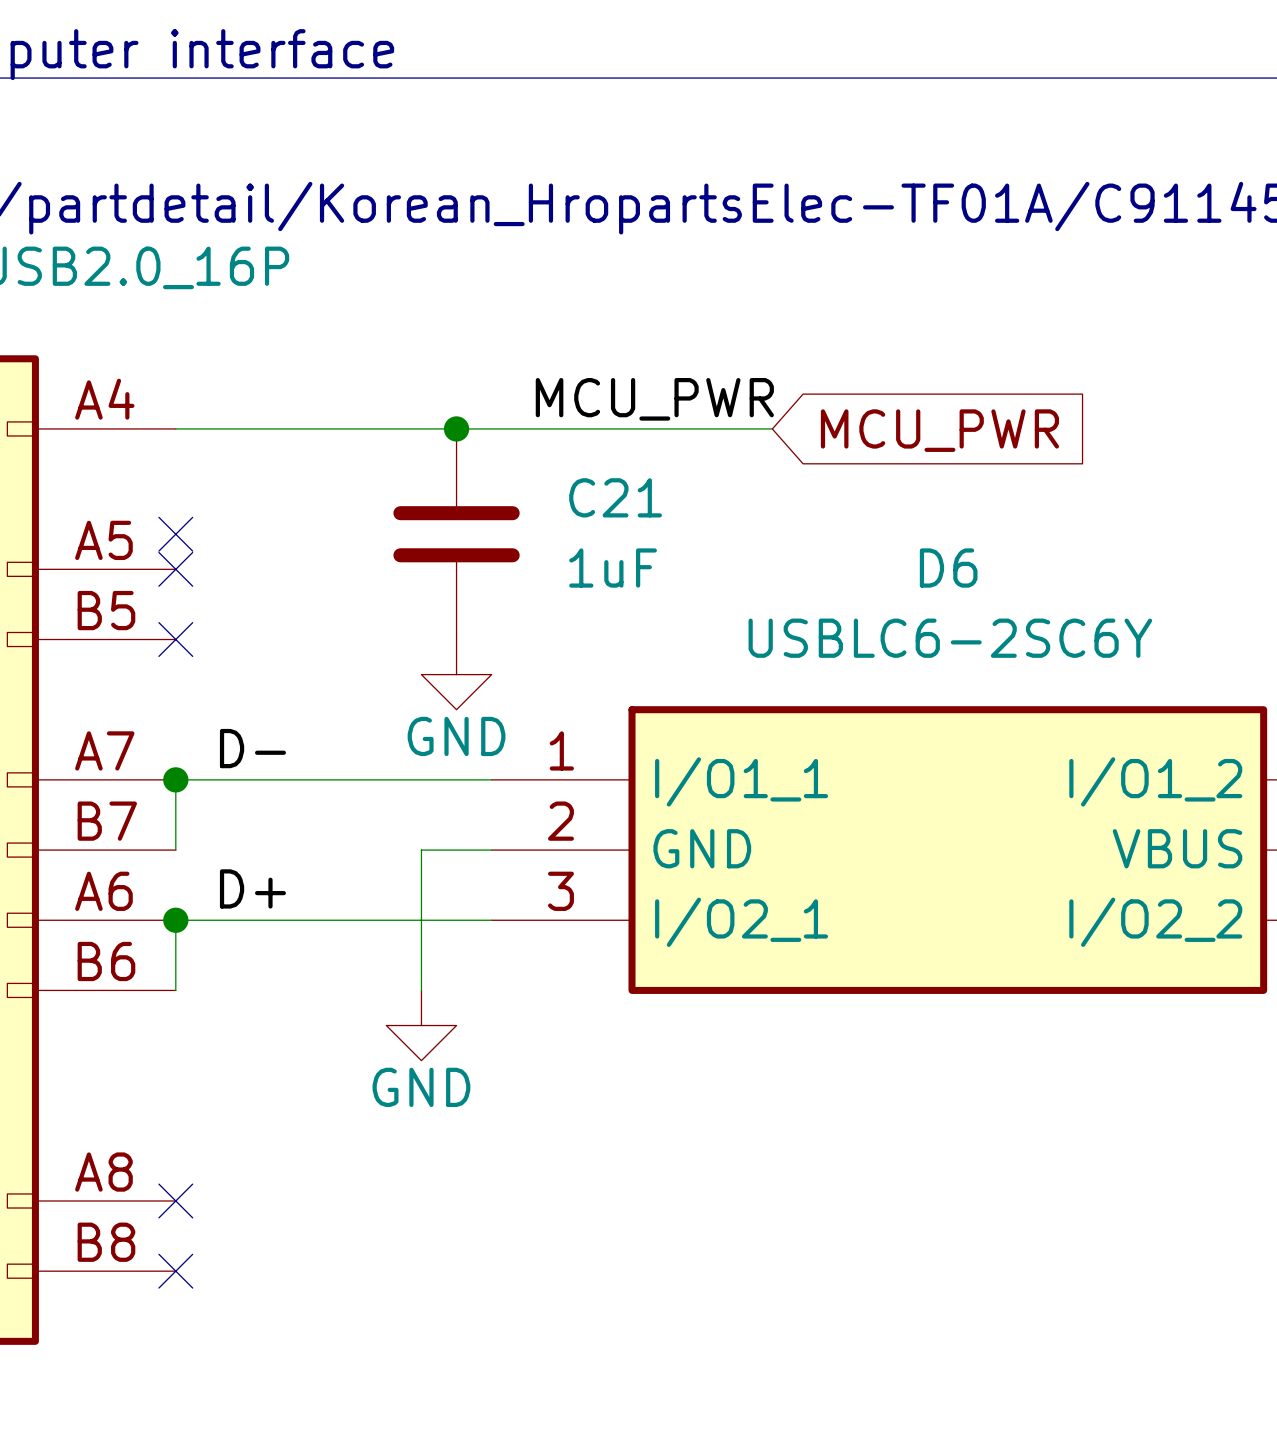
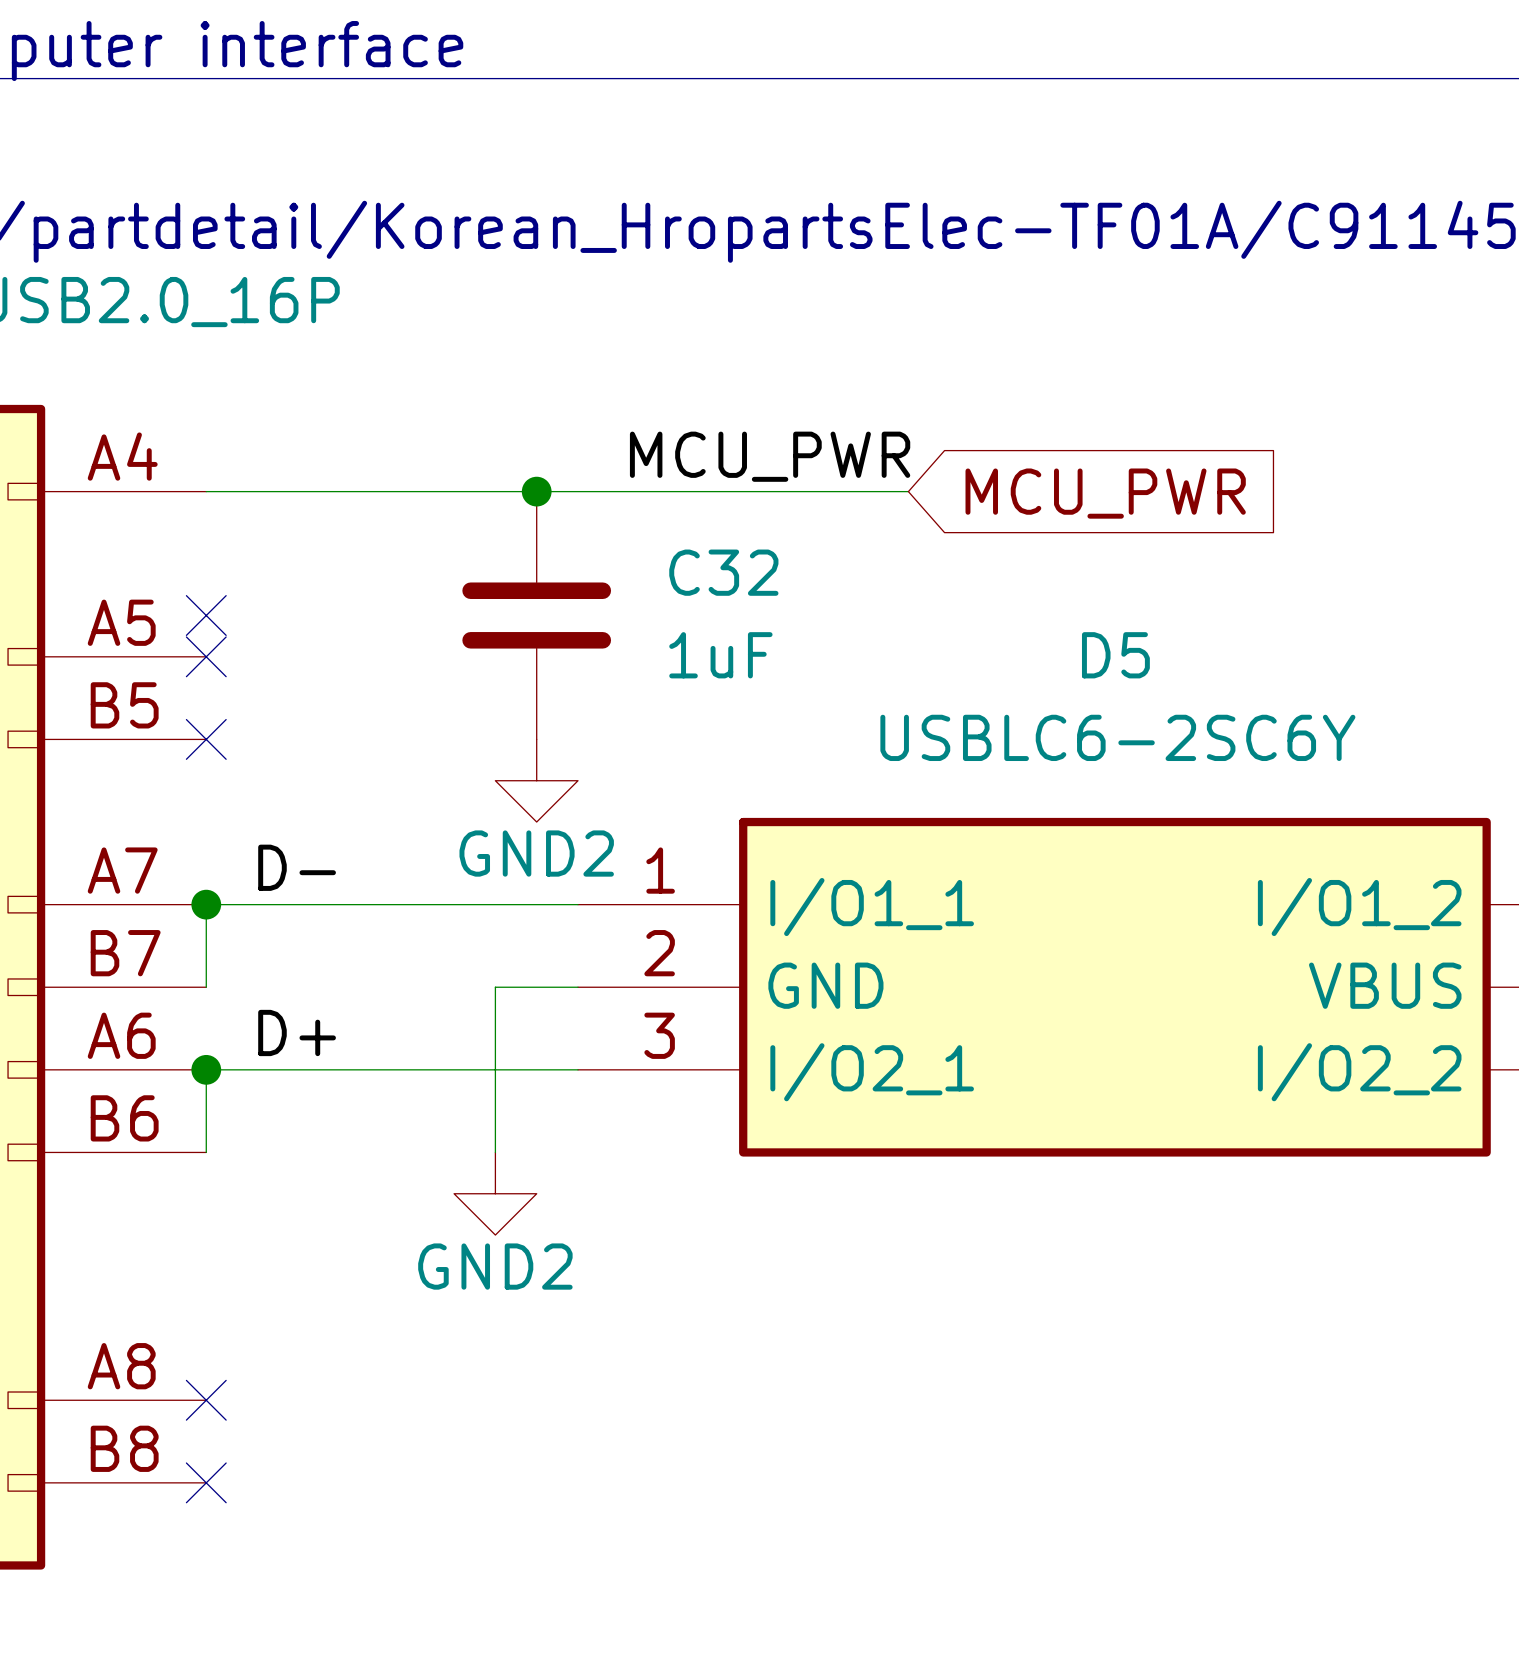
C21 name: C21 (615, 497) -> C32 (723, 572)
D6 name: D6 (948, 568) -> D5 (1115, 655)
power symbol: GND (456, 674) -> GND2 (536, 780)
power symbol: GND (421, 1025) -> GND2 (495, 1193)

